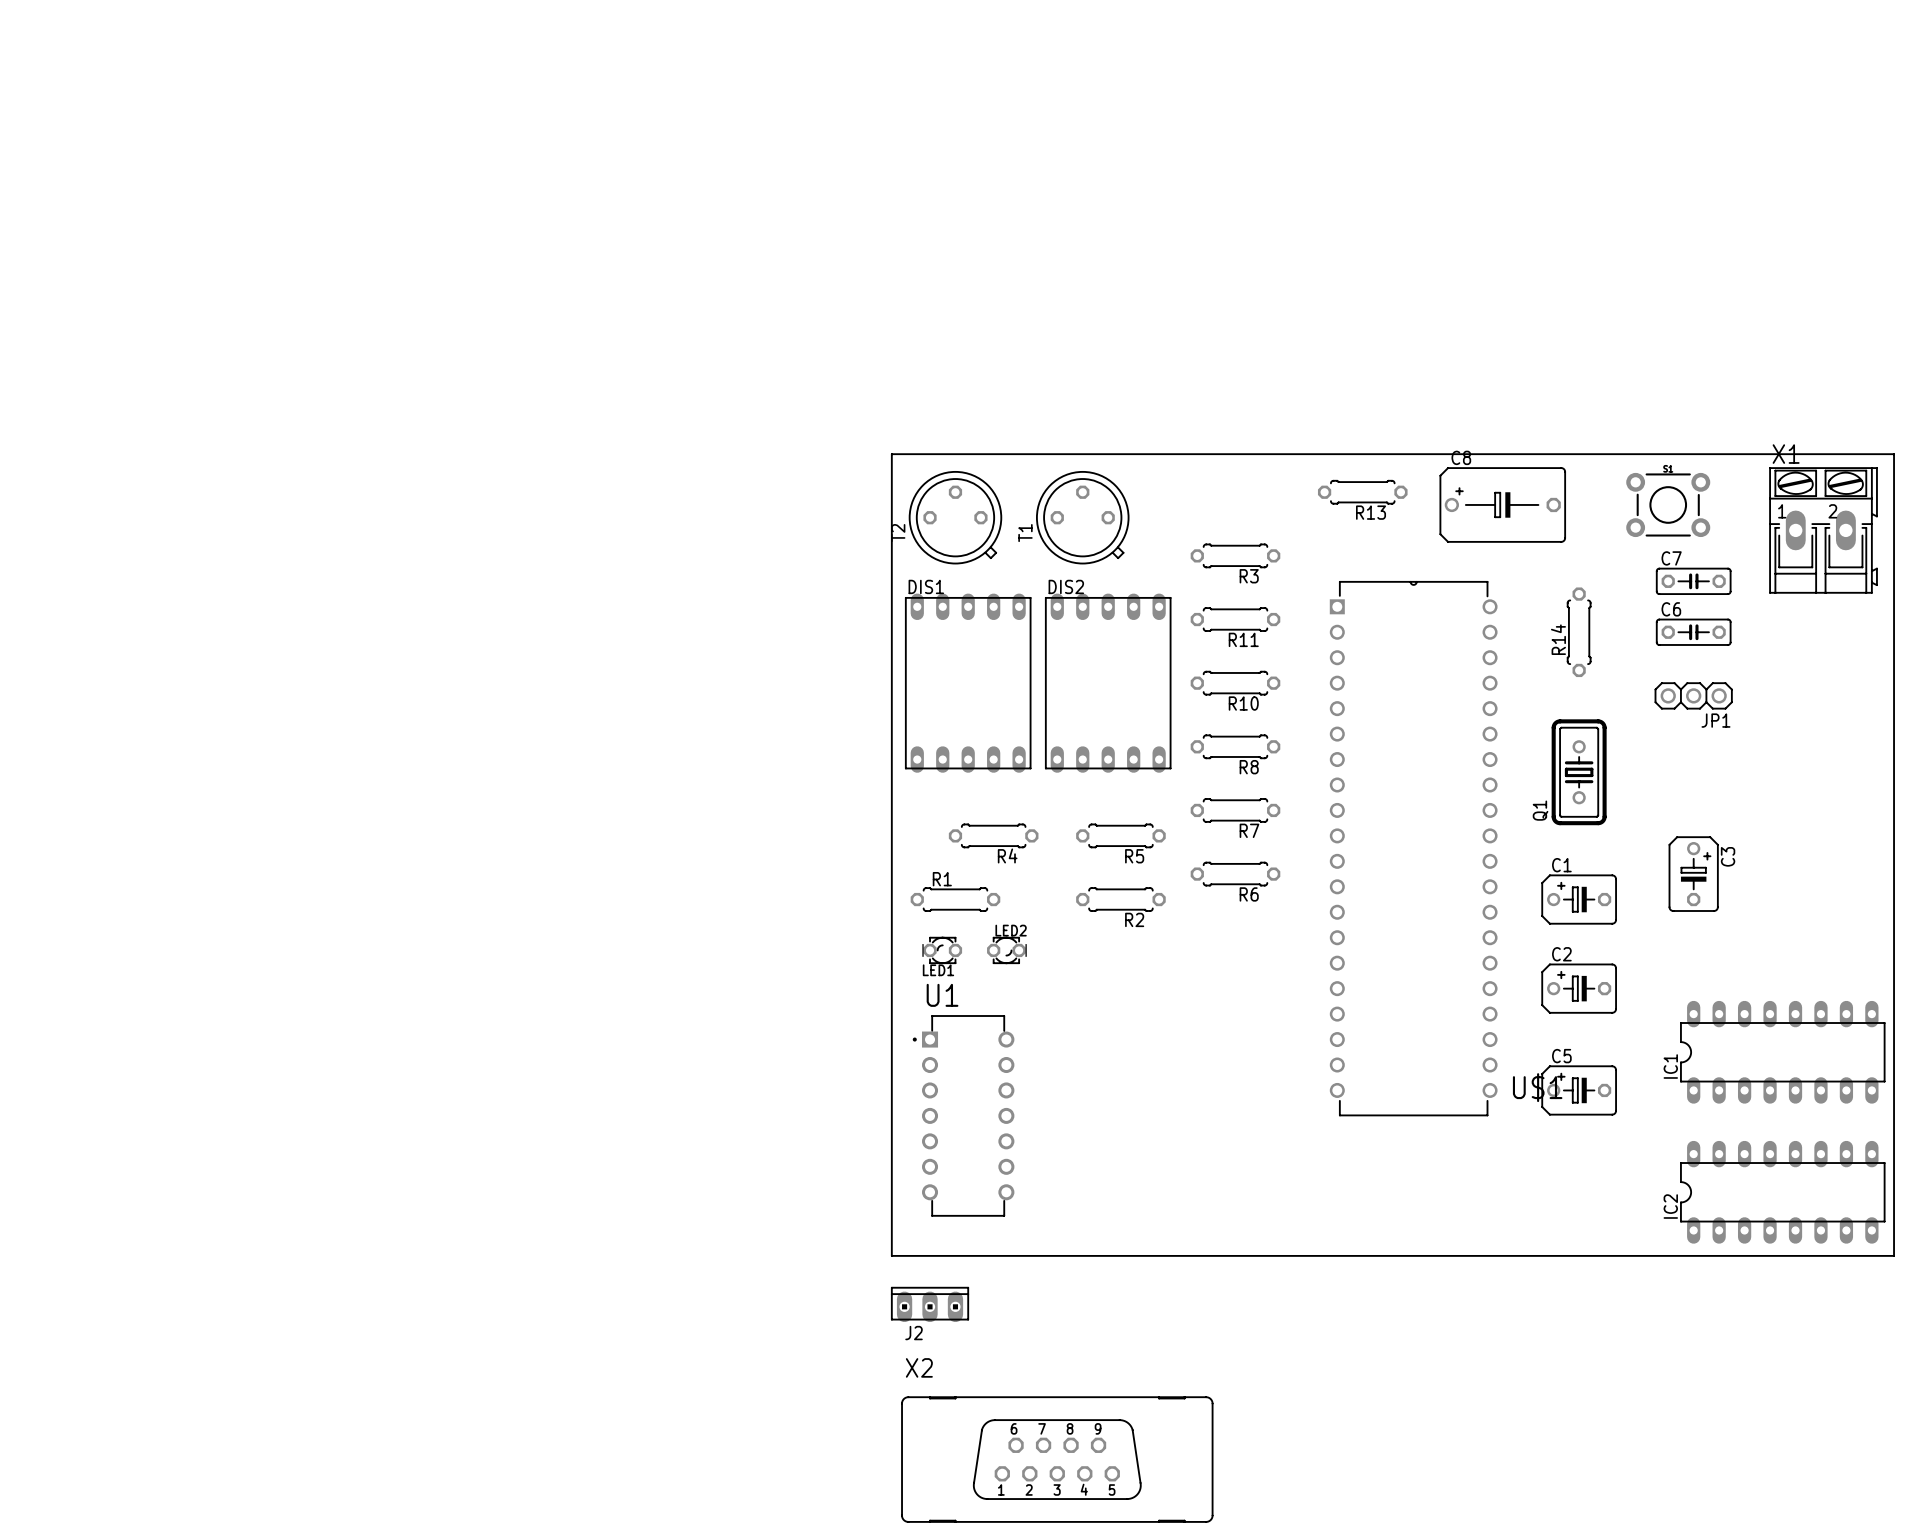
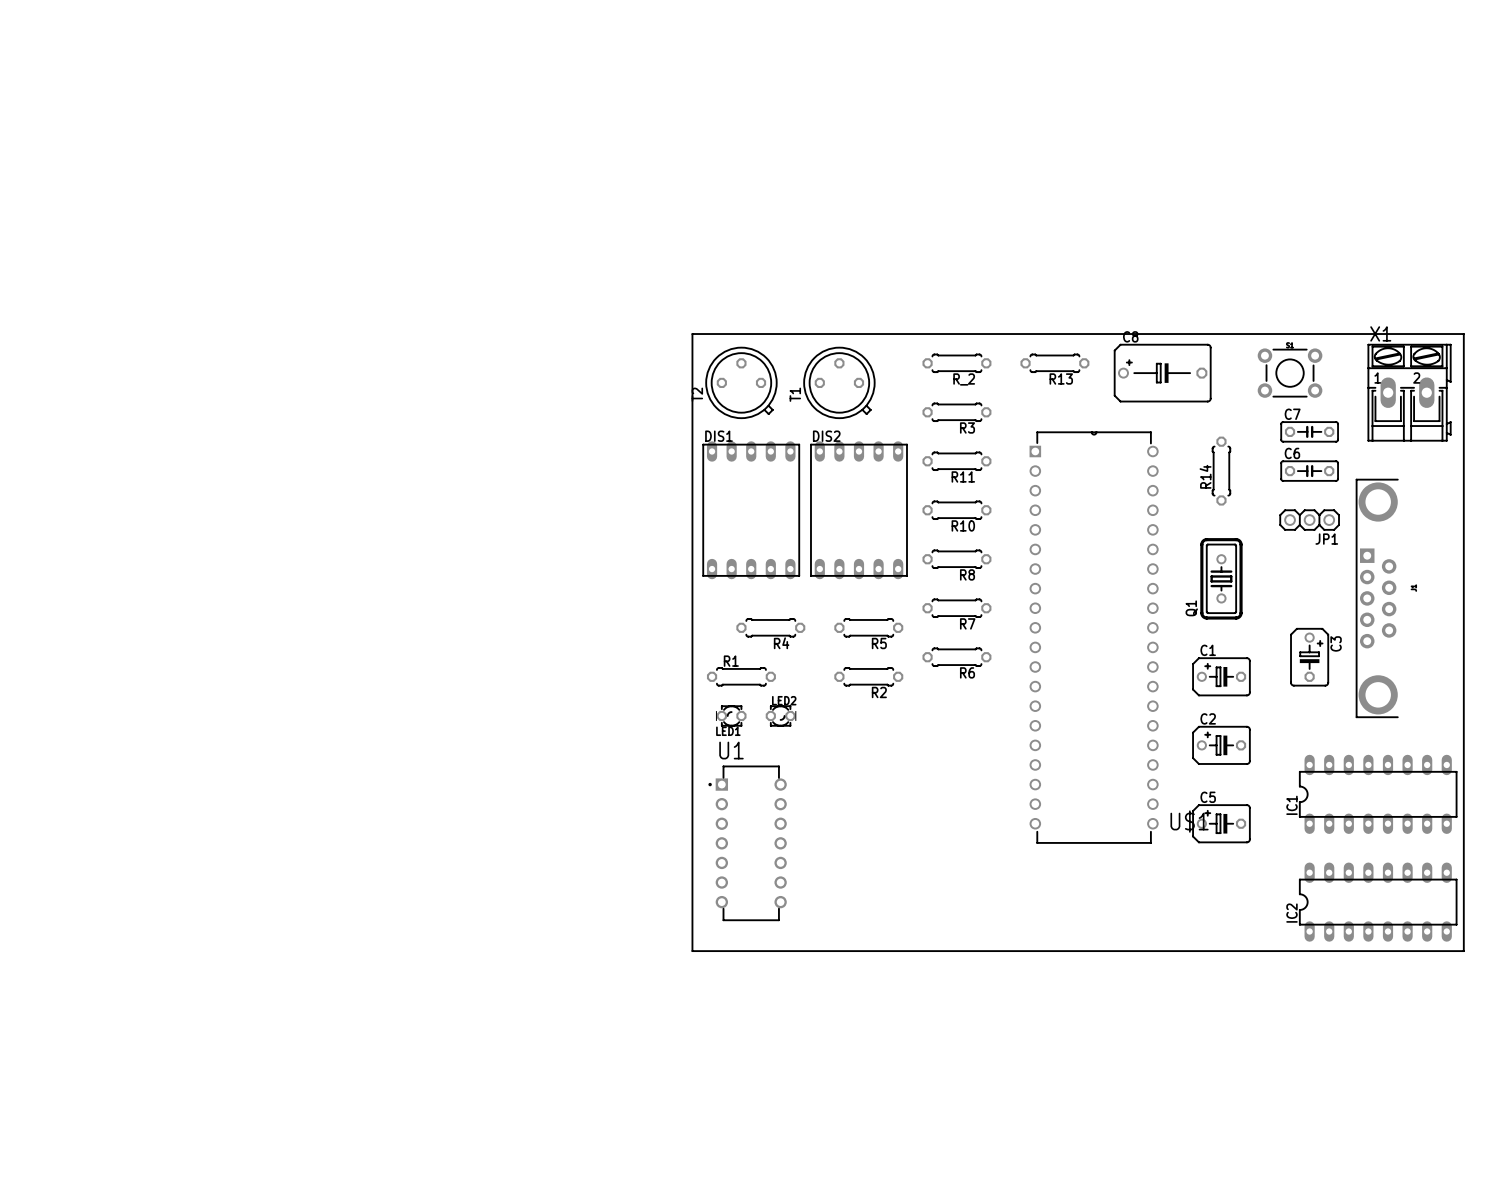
R_2: none -> (956, 363)
part: none -> (1377, 598)
J2: (930, 1304) -> none
X2: (1057, 1459) -> none

